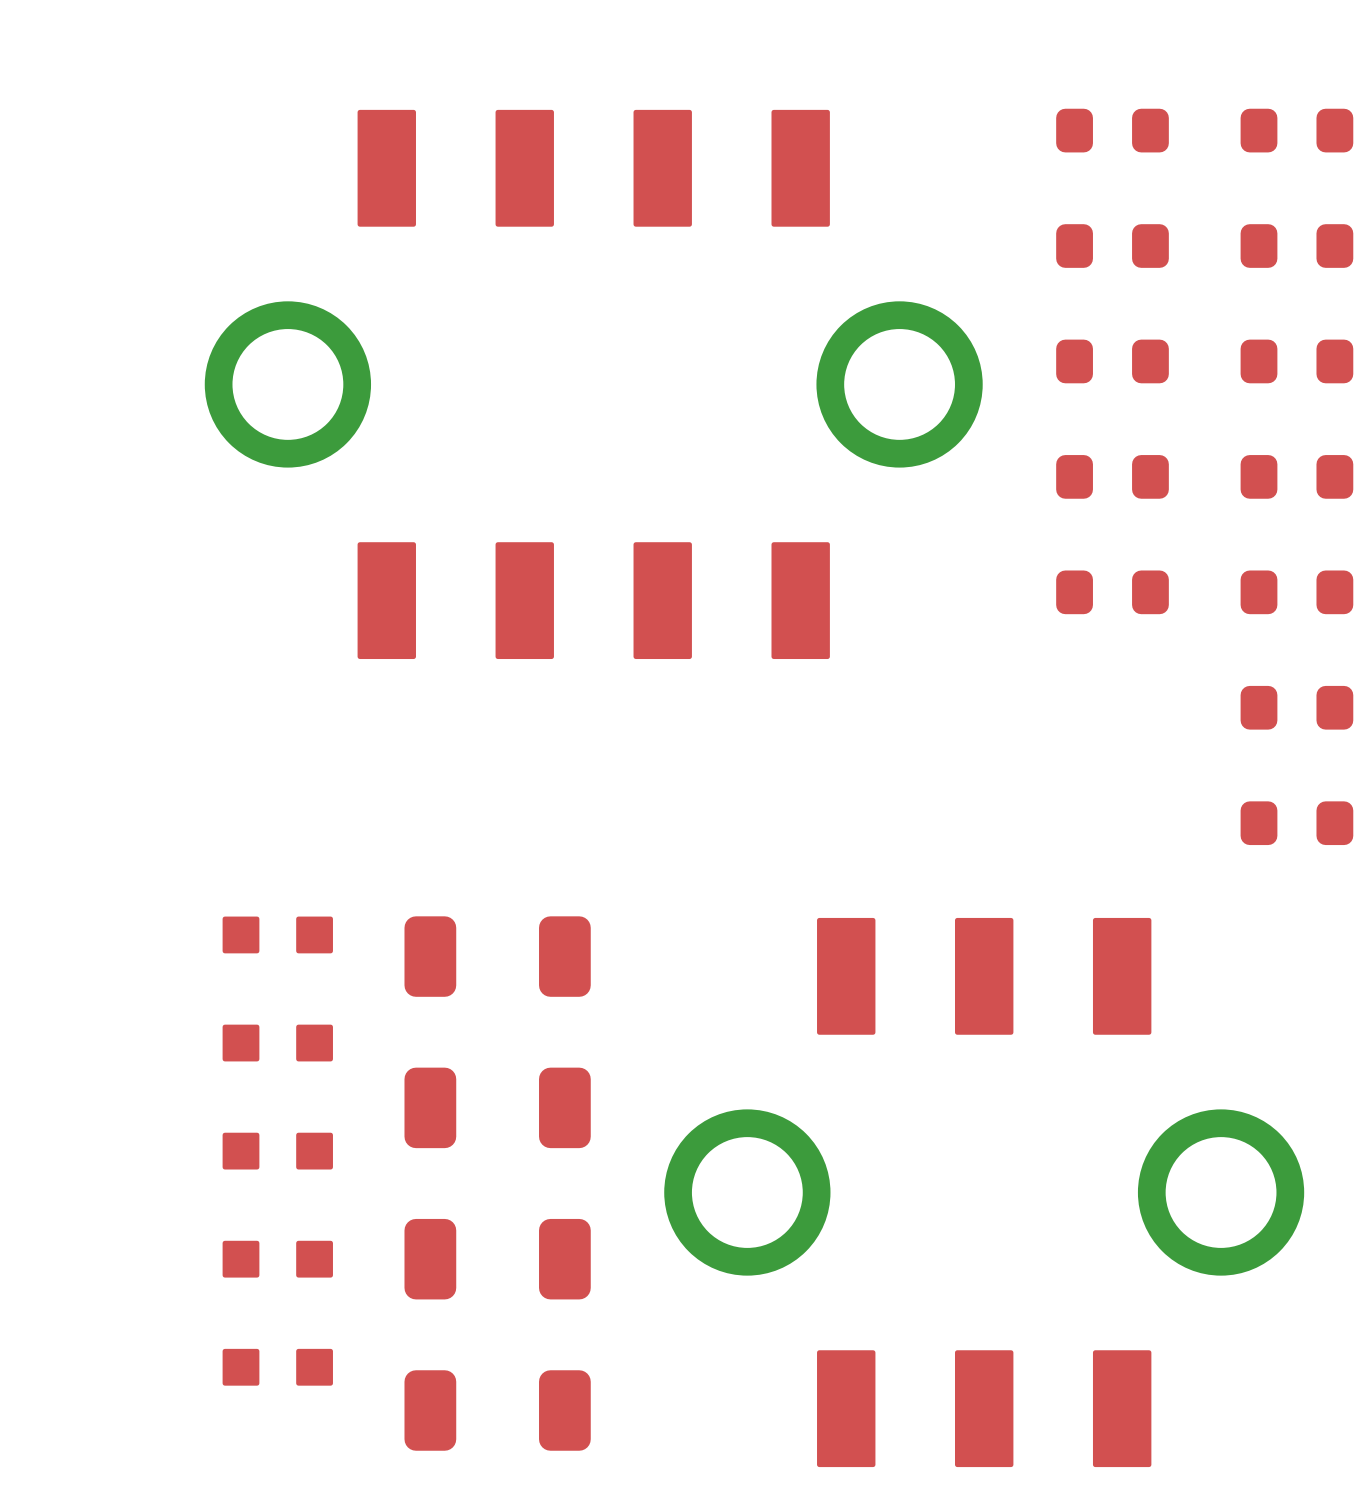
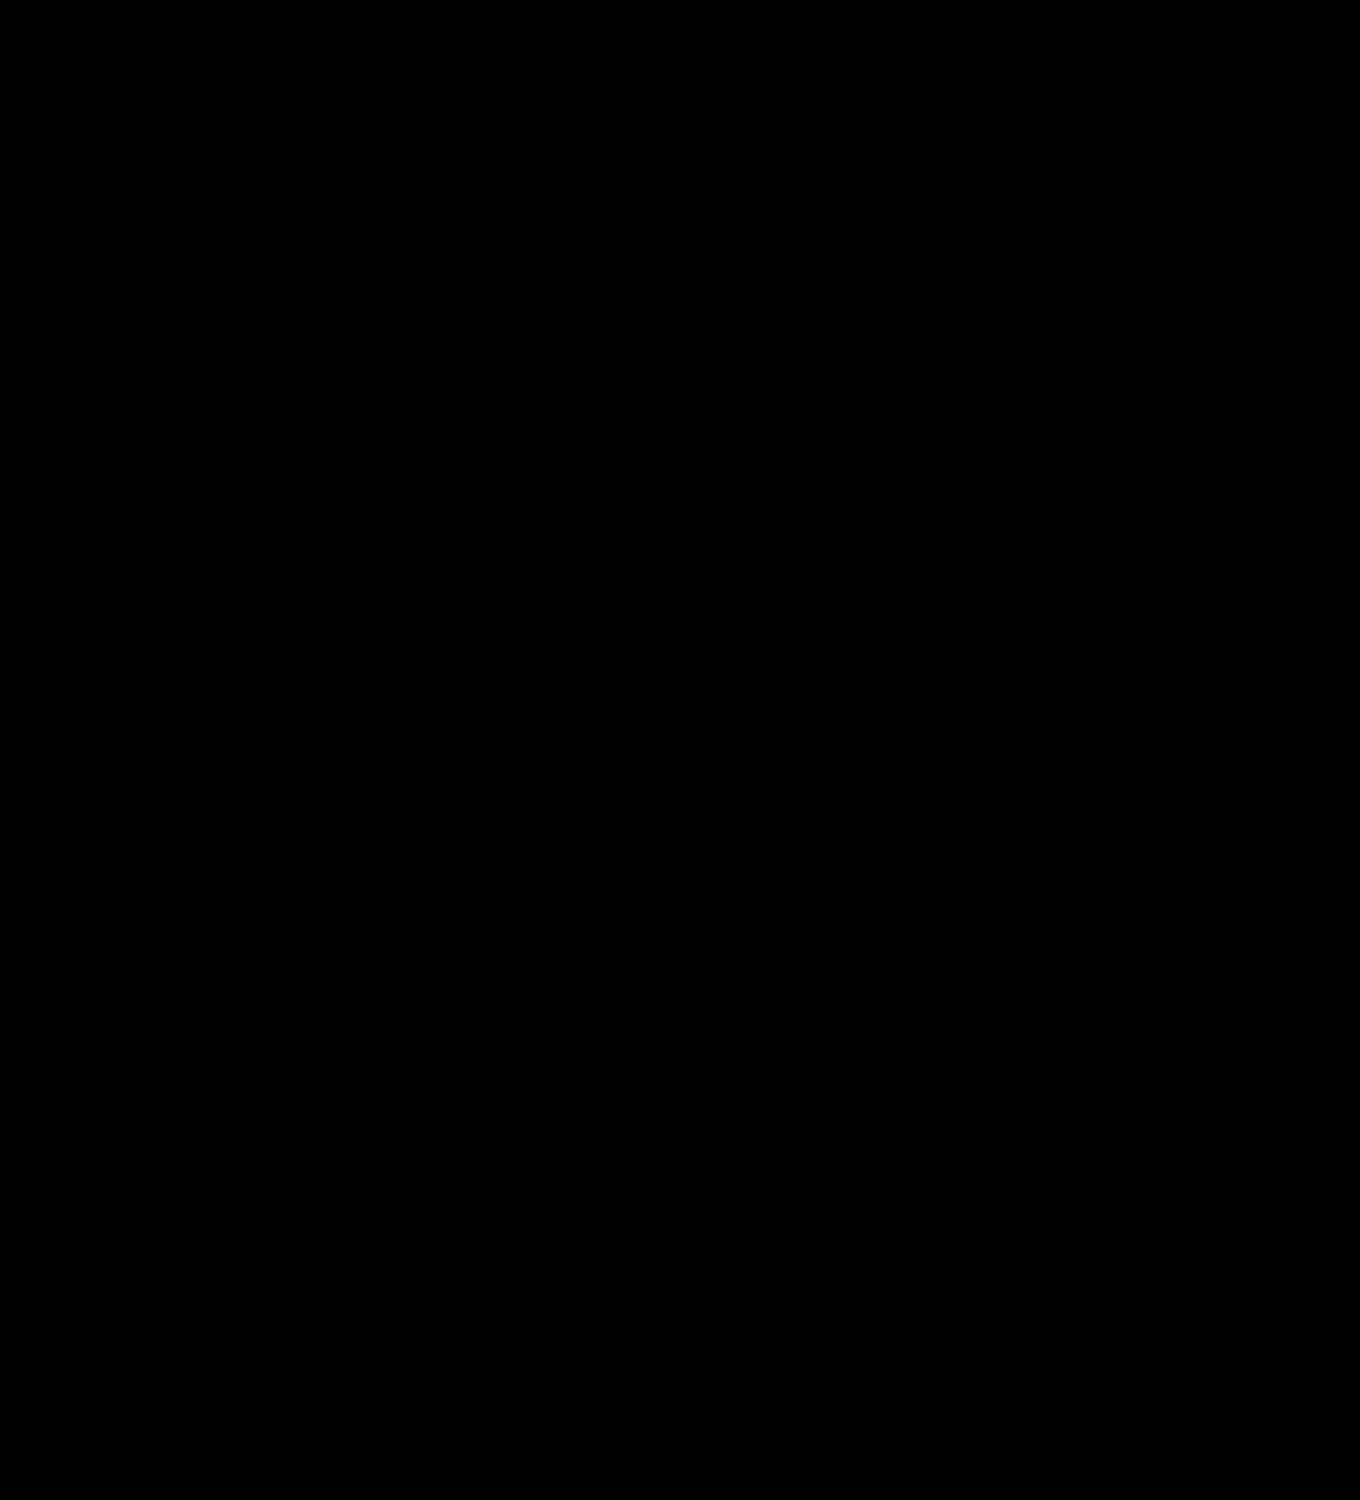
part: (1112, 130) -> none
part: (1296, 130) -> none
part: (1112, 246) -> none
part: (1296, 246) -> none
part: (1112, 361) -> none
part: (1296, 361) -> none
part: (593, 384) -> none
part: (1112, 476) -> none
part: (1296, 476) -> none
part: (1112, 592) -> none
part: (1296, 592) -> none
part: (1296, 707) -> none
part: (1296, 823) -> none
part: (277, 934) -> none
part: (497, 956) -> none
part: (277, 1043) -> none
part: (497, 1107) -> none
part: (277, 1151) -> none
part: (984, 1192) -> none
part: (277, 1259) -> none
part: (497, 1259) -> none
part: (277, 1367) -> none
part: (497, 1410) -> none

